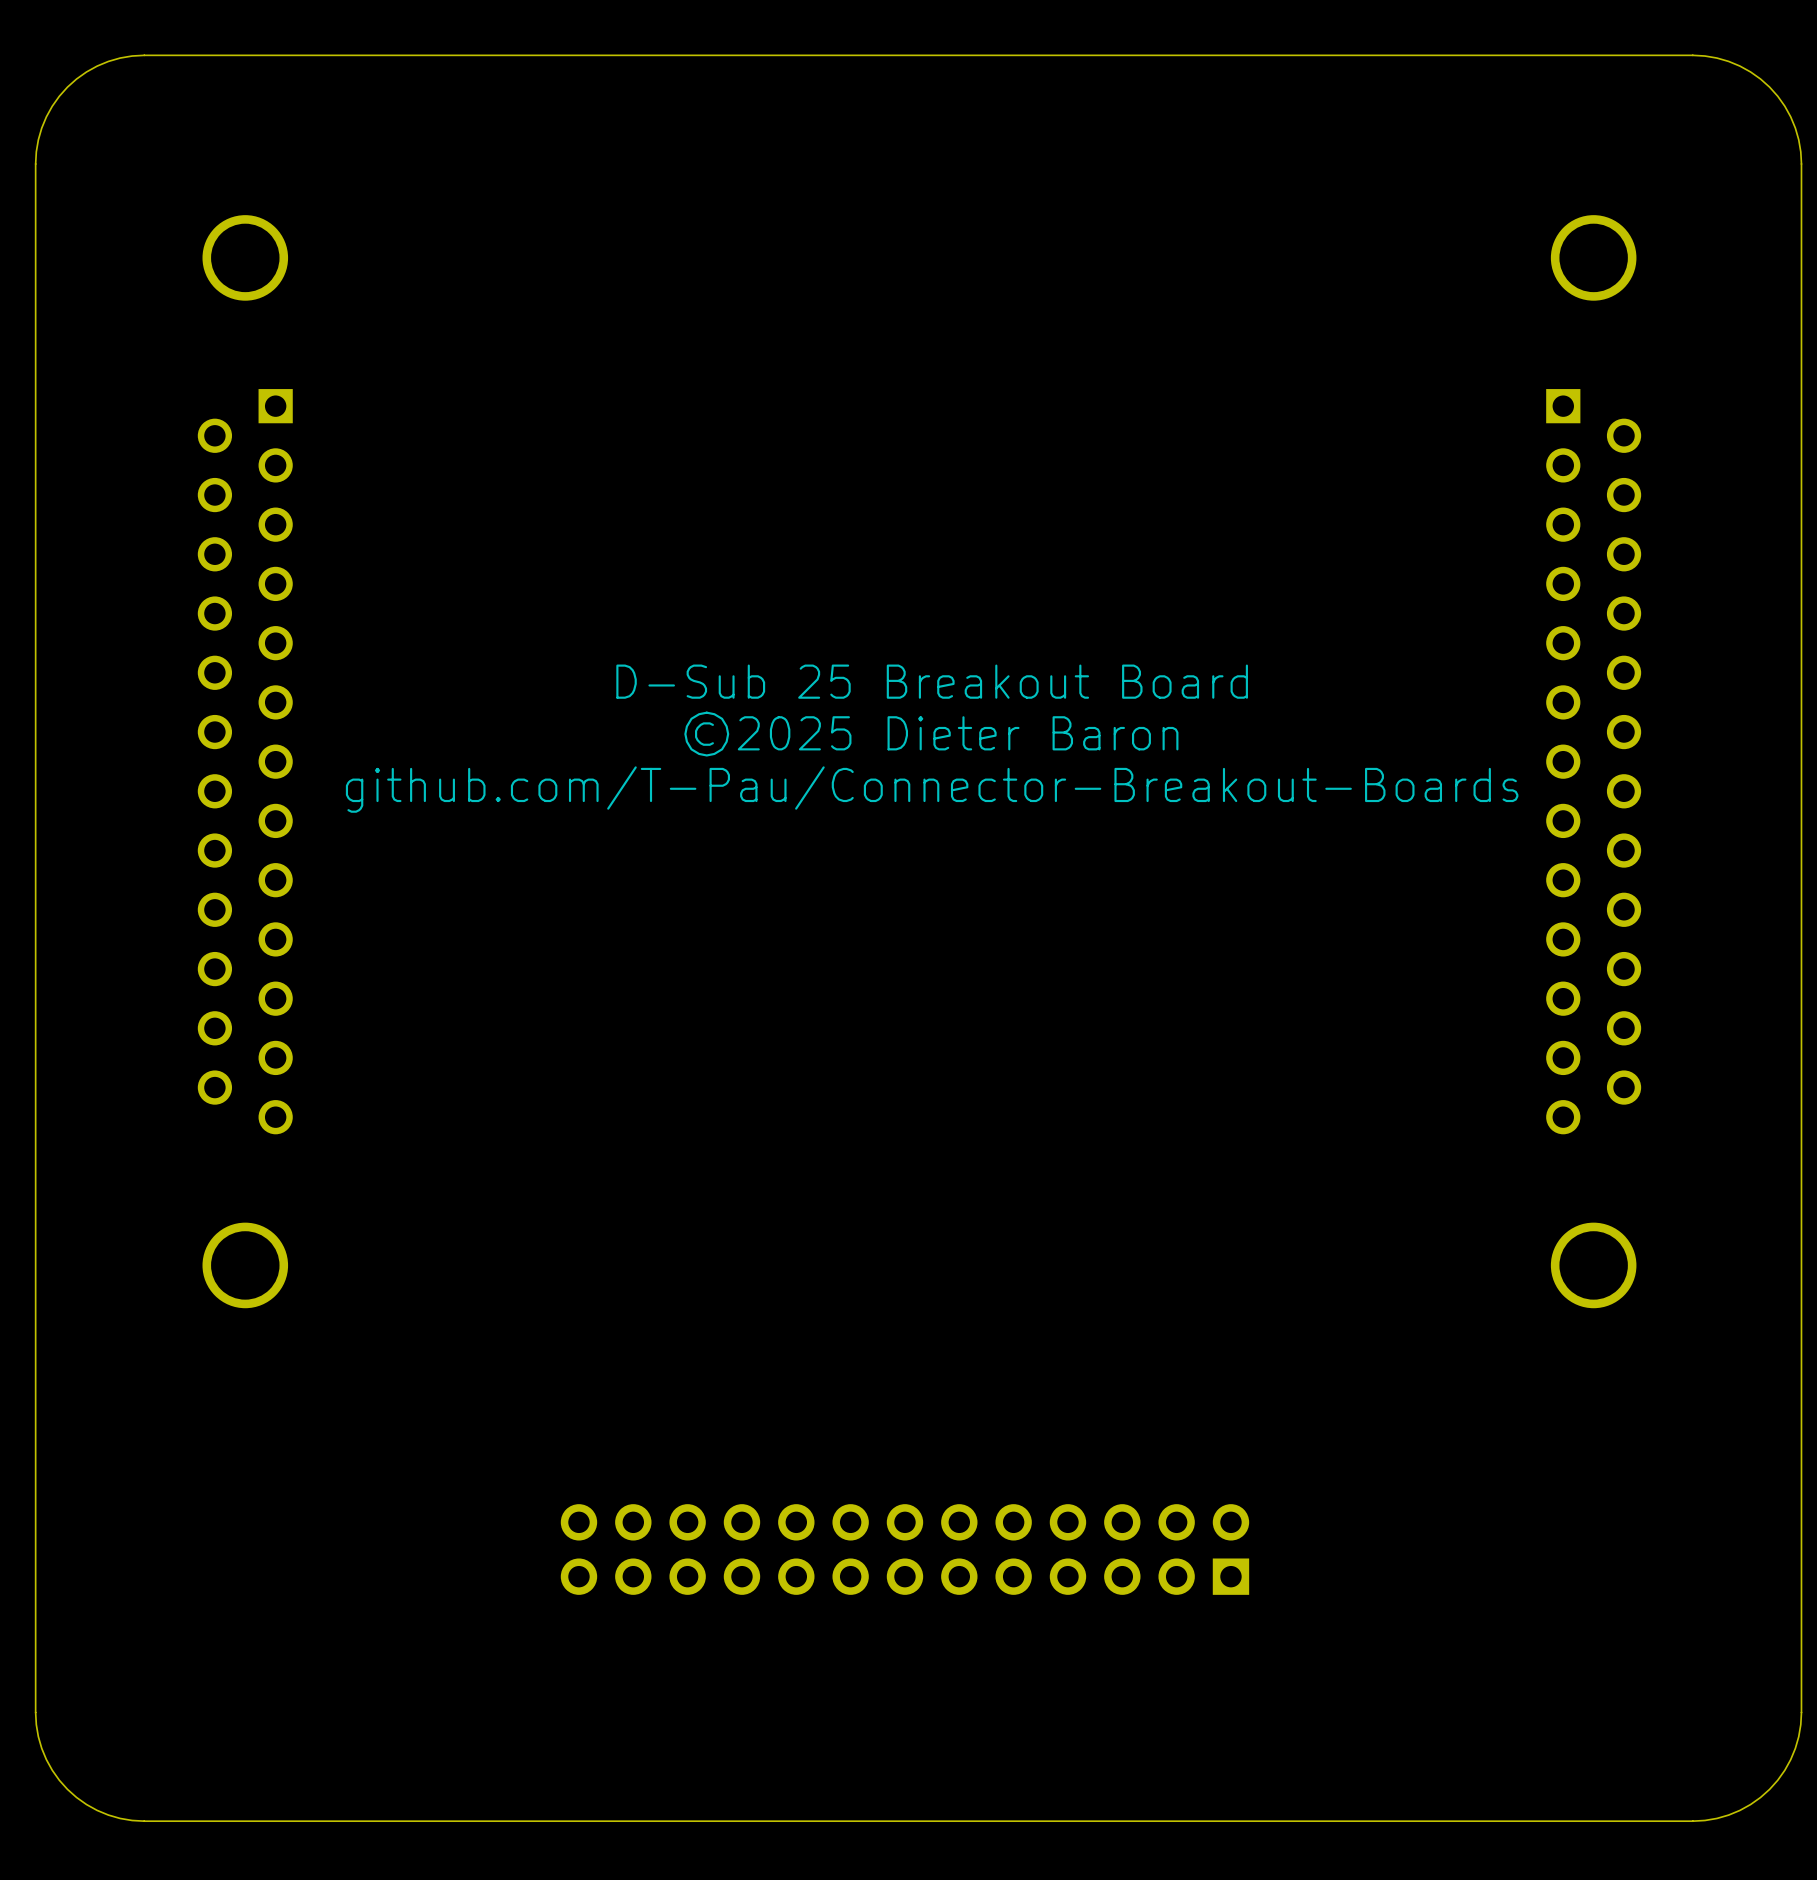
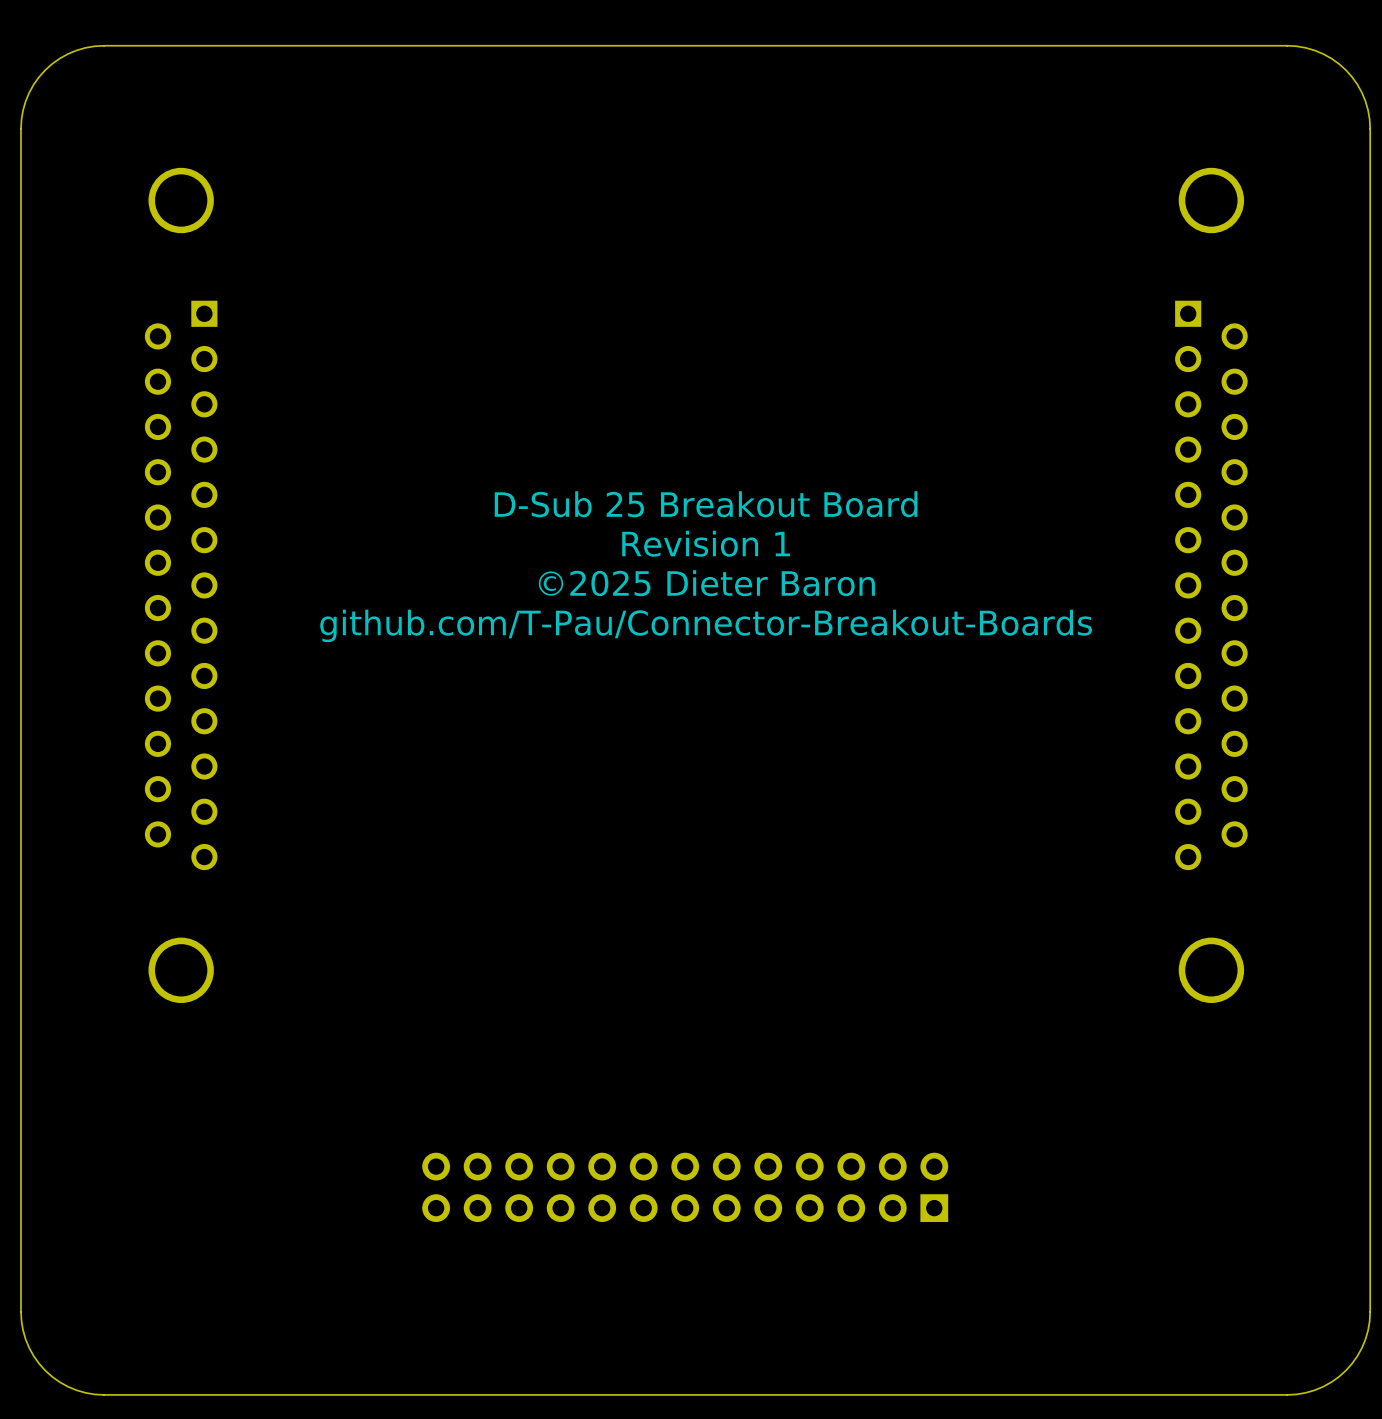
text position: D-Sub 25 Breakout Board (932, 681) -> D-Sub 25 Breakout Board (706, 504)
text: none -> Revision 1 (706, 543)
text position: ©2025 Dieter Baron (931, 734) -> ©2025 Dieter Baron (706, 583)
text position: github.com/T-Pau/Connector-Breakout-Boards (932, 789) -> github.com/T-Pau/Connector-Breakout-Boards (706, 625)

